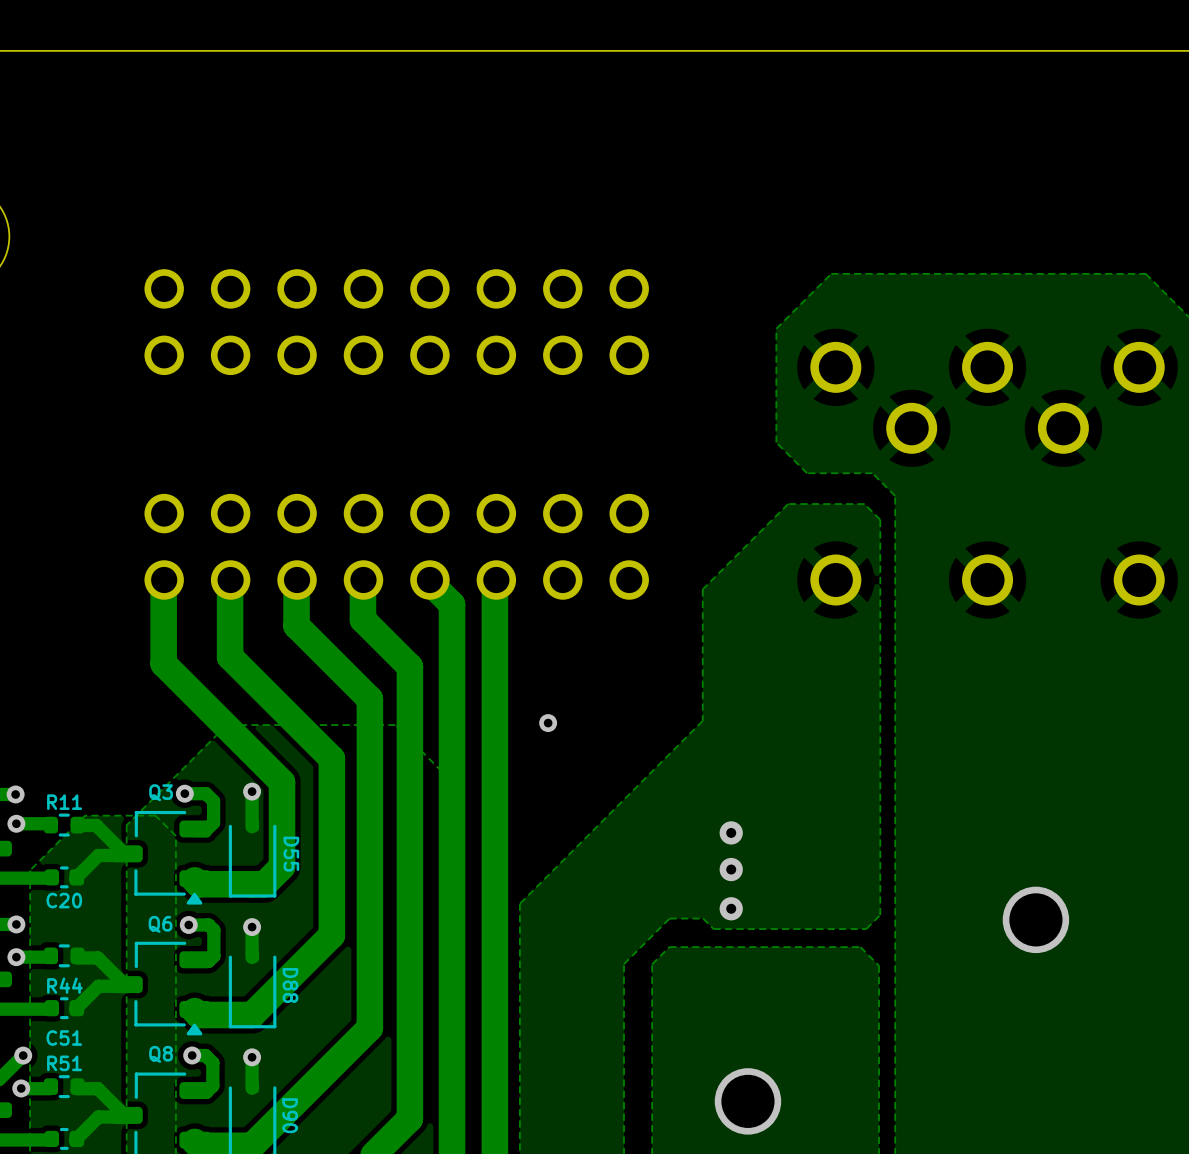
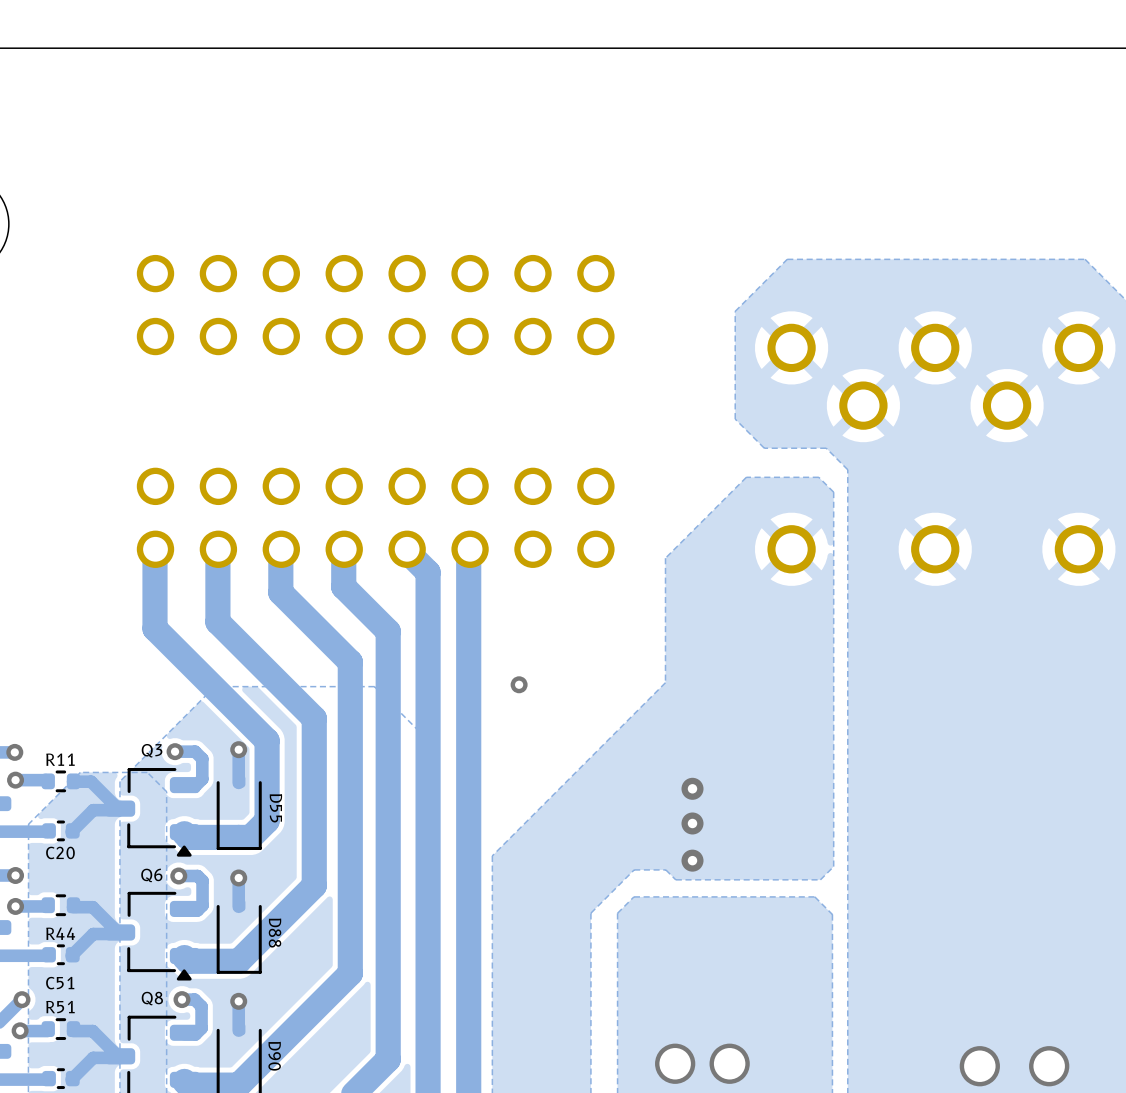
via: (1035, 919) -> none
via: (747, 1101) -> none
via: none -> (675, 1063)
via: none -> (729, 1063)
via: none -> (979, 1066)
via: none -> (1049, 1066)

